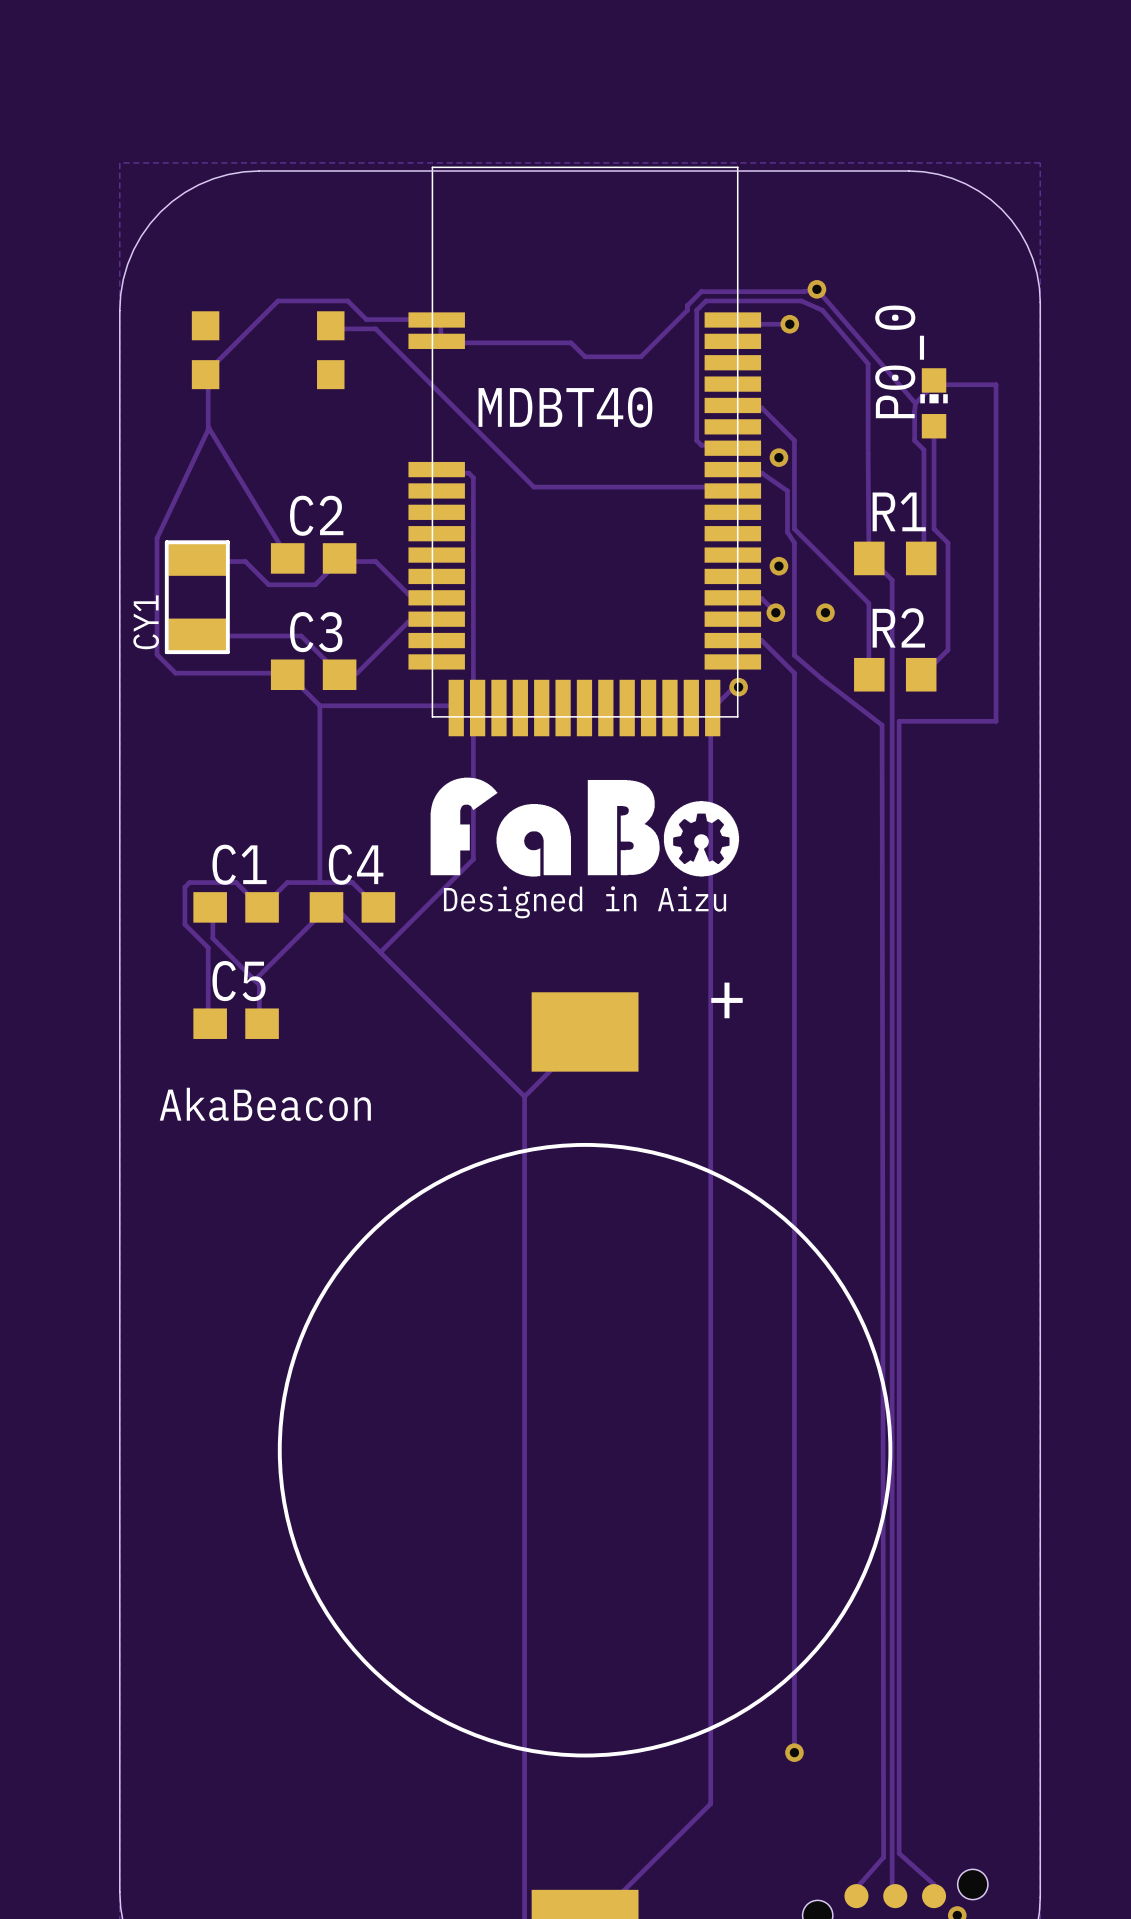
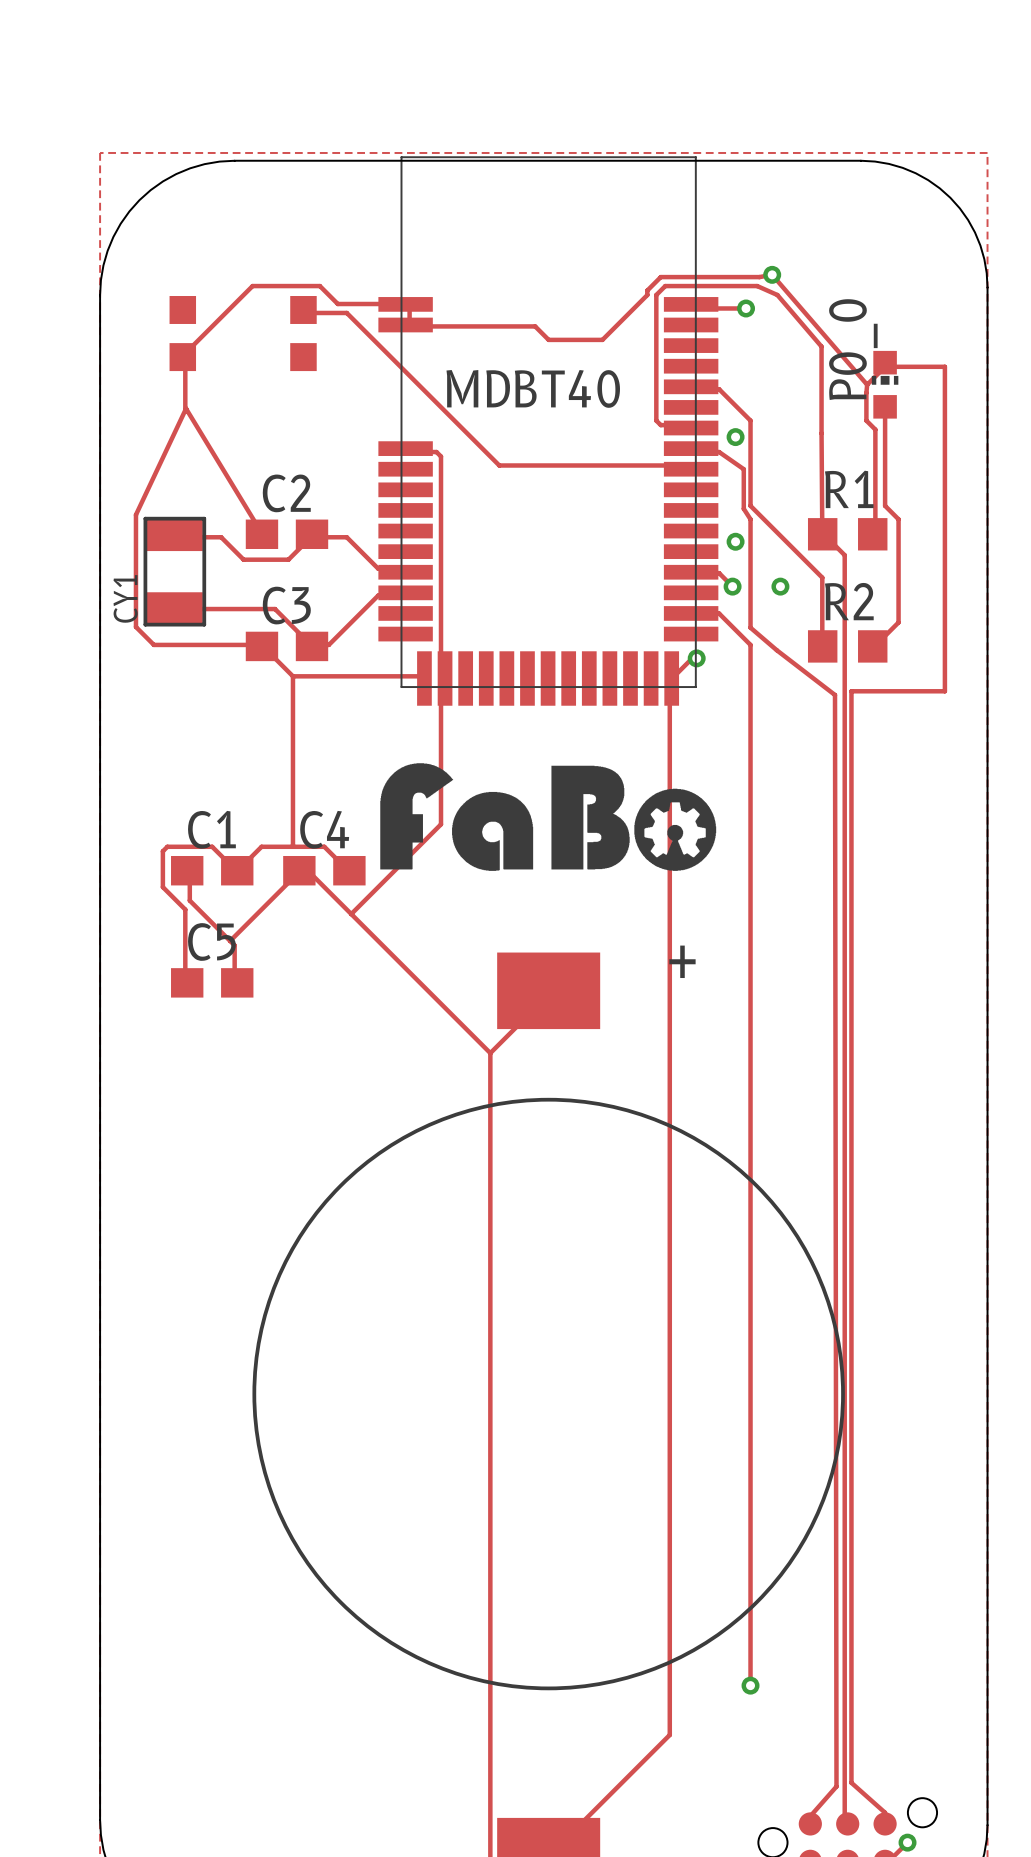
drawing shape: [430, 777, 740, 877] -> [380, 763, 717, 871]
text: Designed in Aizu (585, 902) -> none
text: AkaBeacon (265, 1104) -> none

